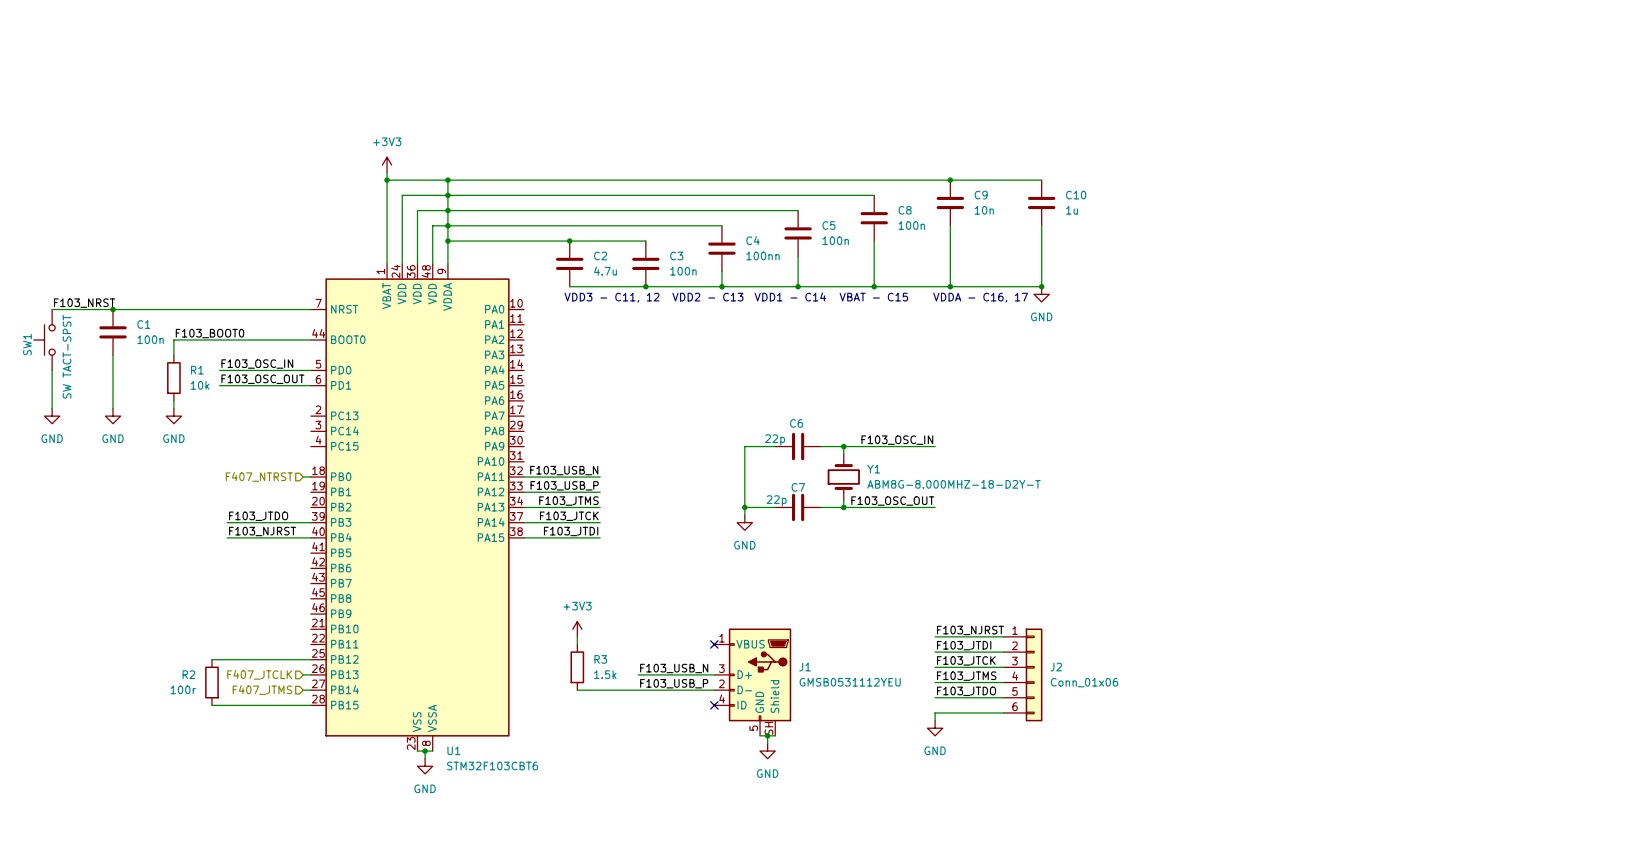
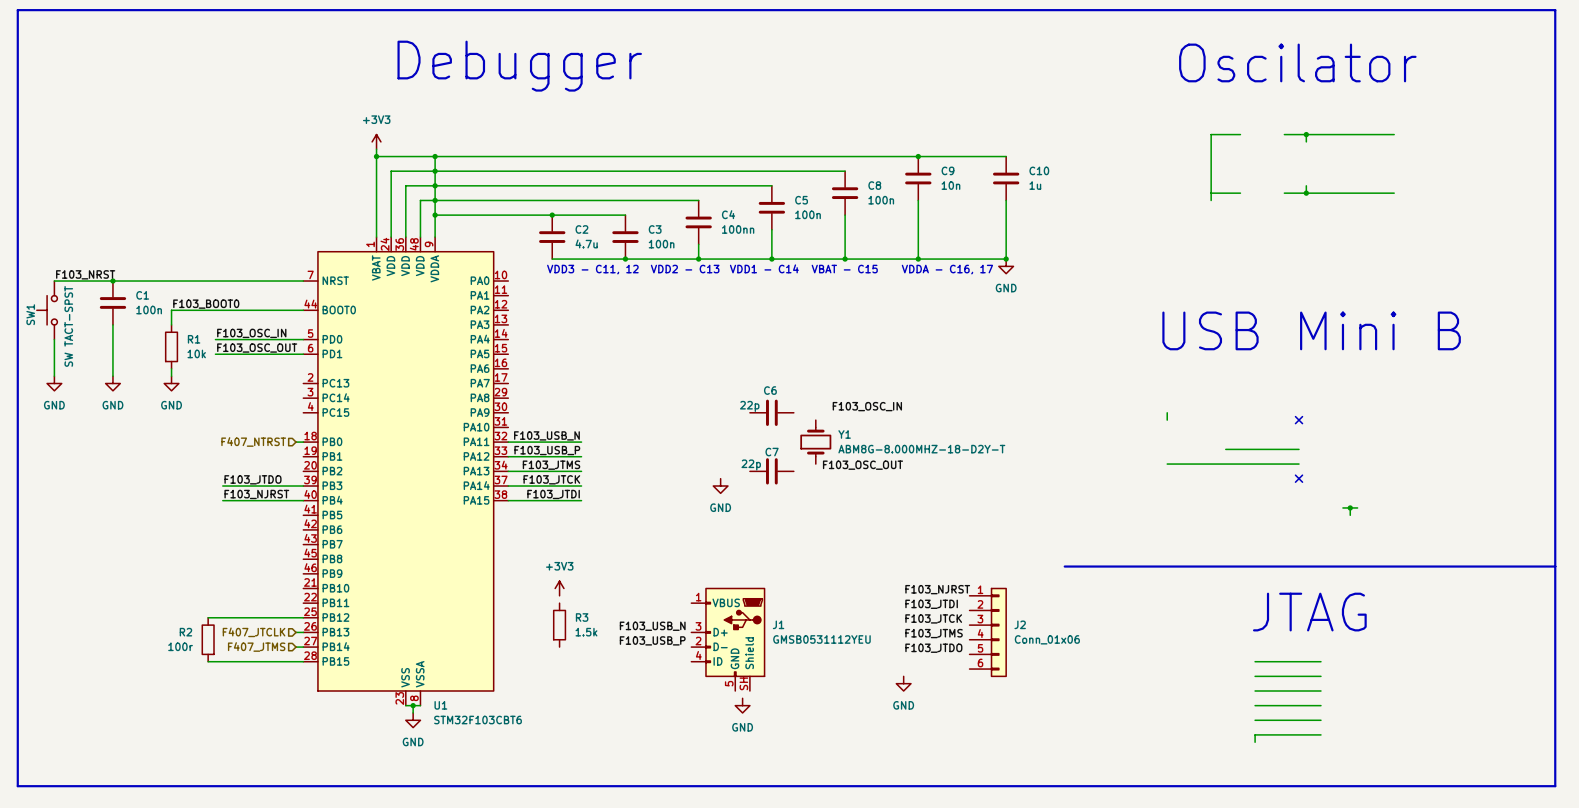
line: none -> (17, 10) (17, 786) (1555, 786) (1555, 10) (17, 10)
text: none -> Oscilator (1297, 62)
text: none -> Debugger (519, 66)
wire: none -> (1240, 134) (1211, 134) (1211, 200)
wire: none -> (1284, 134) (1394, 134)
wire: none -> (1306, 134) (1306, 141)
junction: none -> (1306, 134)
wire: none -> (1306, 185) (1306, 193)
wire: none -> (1211, 193) (1240, 193)
wire: none -> (1284, 193) (1394, 193)
junction: none -> (1306, 193)
text: none -> USB Mini B (1311, 330)
wire: (775, 446) (744, 446) (744, 515) -> none
wire: (820, 446) (935, 446) -> none
wire: (843, 446) (843, 454) -> none
junction: (843, 446) -> none
wire: none -> (1167, 412) (1167, 420)
no-connect mark: none -> (1299, 420)
wire: none -> (1225, 449) (1299, 449)
wire: (843, 499) (843, 507) -> none
wire: none -> (1167, 464) (1299, 464)
wire: (744, 507) (775, 507) -> none
junction: (744, 507) -> none
wire: (820, 507) (935, 507) -> none
junction: (843, 507) -> none
no-connect mark: none -> (1299, 478)
wire: none -> (1342, 507) (1357, 507)
wire: none -> (1350, 507) (1350, 515)
junction: none -> (1350, 507)
line: none -> (1064, 566) (1555, 566)
wire: (577, 636) (577, 644) -> none
wire: (935, 636) (1003, 636) -> none
no-connect mark: (714, 644) -> none
wire: (935, 652) (1003, 652) -> none
text: none -> JTAG (1309, 612)
wire: (935, 667) (1003, 667) -> none
wire: (638, 674) (714, 674) -> none
wire: (935, 682) (1003, 682) -> none
wire: (577, 690) (714, 690) -> none
wire: (935, 697) (1003, 697) -> none
no-connect mark: (714, 705) -> none
wire: none -> (1255, 661) (1320, 661)
wire: (1003, 712) (935, 712) (935, 720) -> none
wire: none -> (1255, 676) (1320, 676)
wire: (760, 735) (775, 735) -> none
wire: (767, 735) (767, 743) -> none
junction: (767, 735) -> none
wire: none -> (1255, 691) (1320, 691)
wire: none -> (1255, 705) (1320, 705)
wire: none -> (1255, 720) (1320, 720)
wire: none -> (1320, 734) (1255, 734) (1255, 742)

